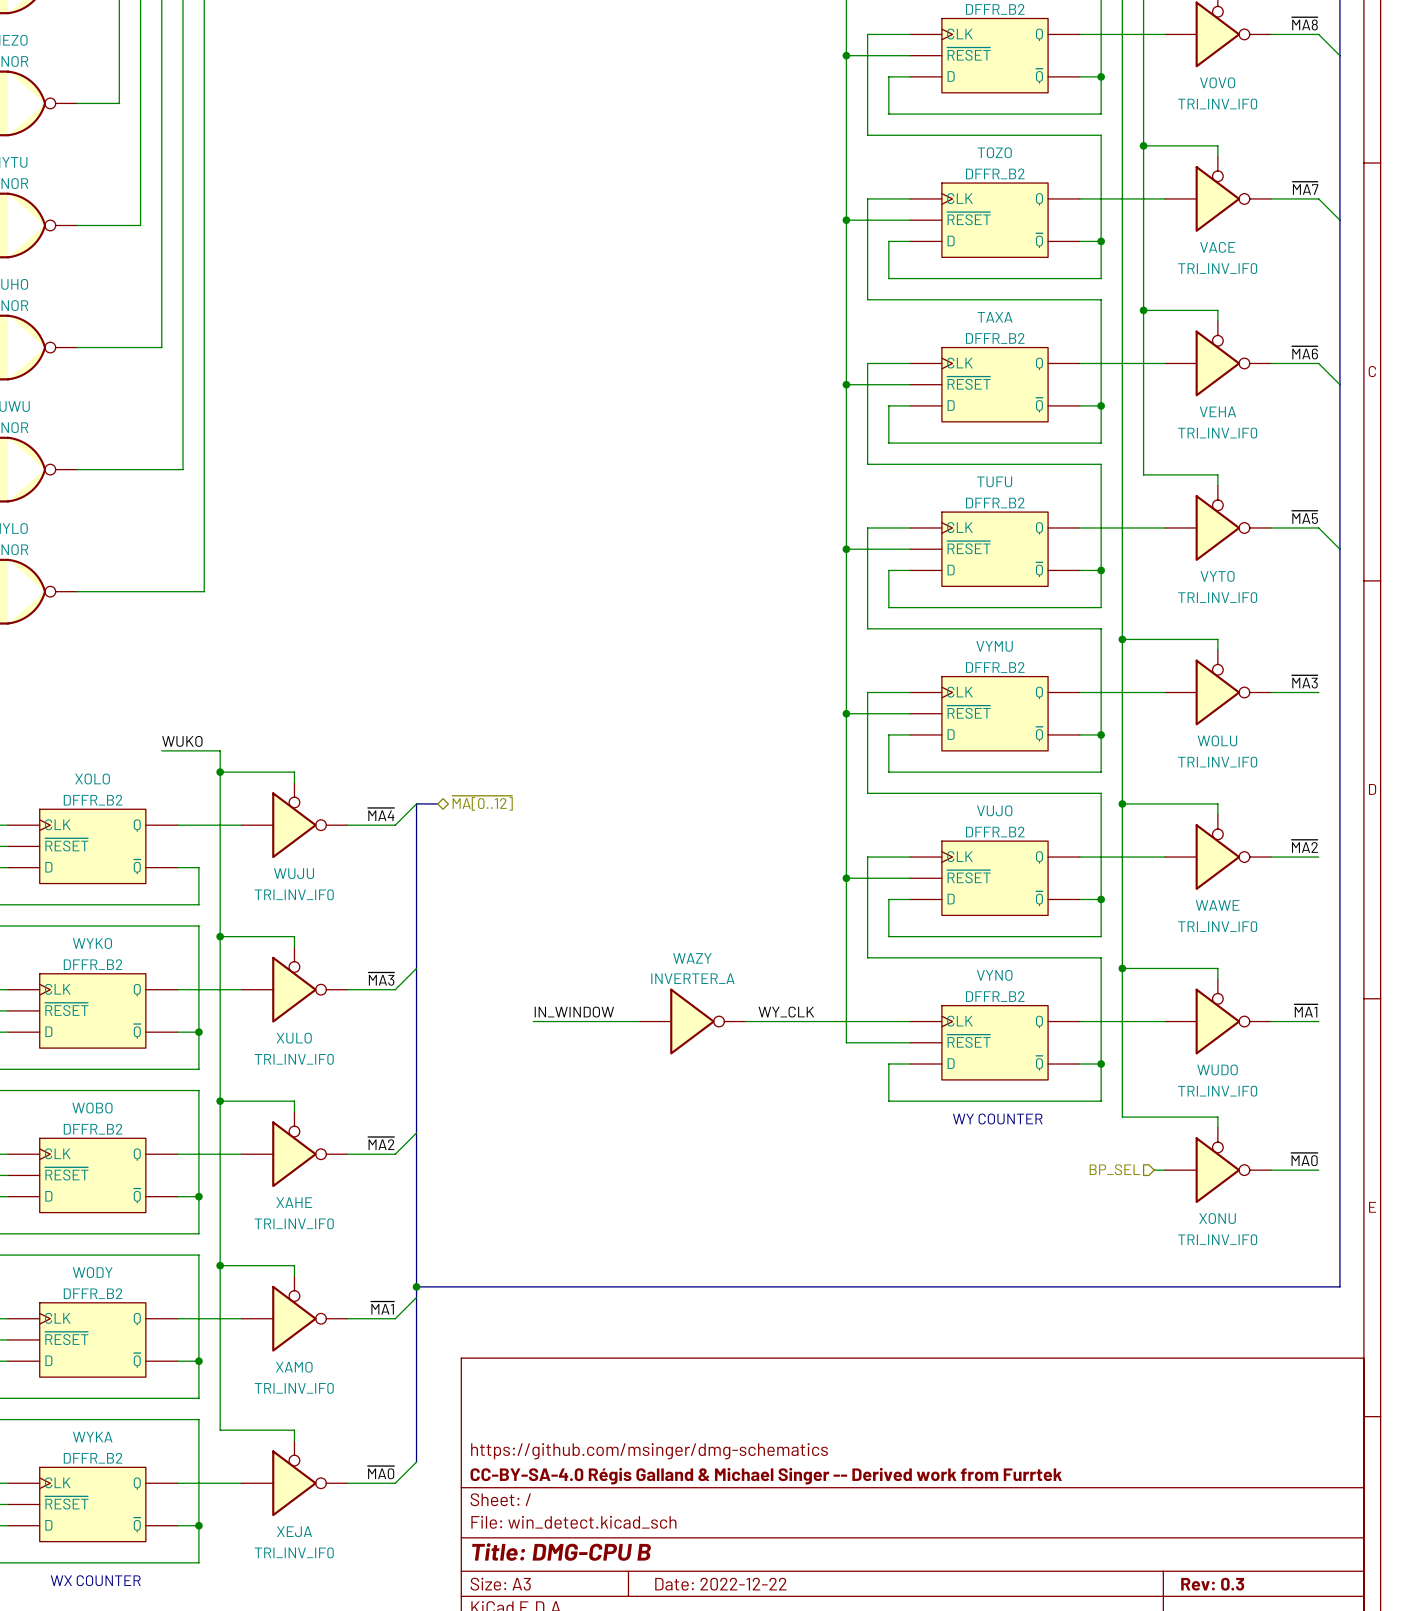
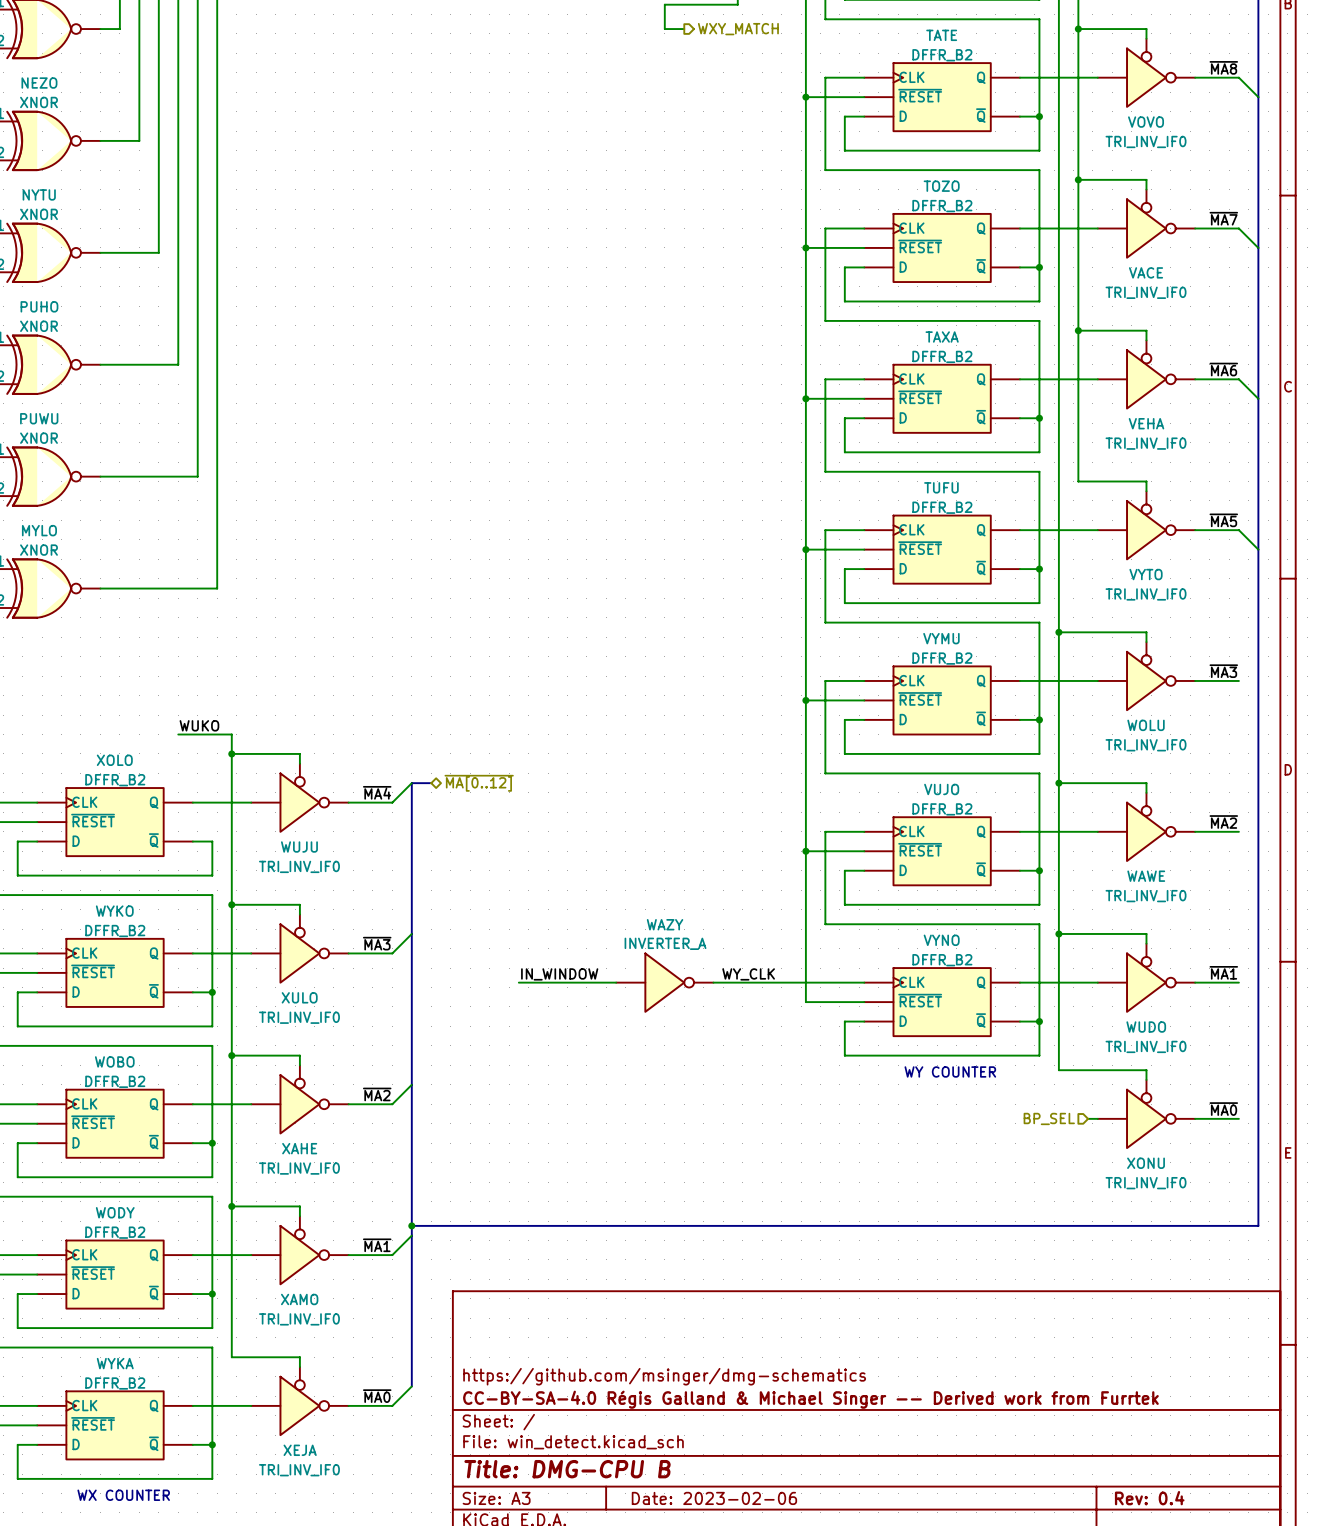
title block: Date: 2022-12-22 (720, 1584) -> Date: 2023-02-06 (714, 1498)
title block: Rev: 0.3 (1212, 1584) -> Rev: 0.4 (1149, 1498)

